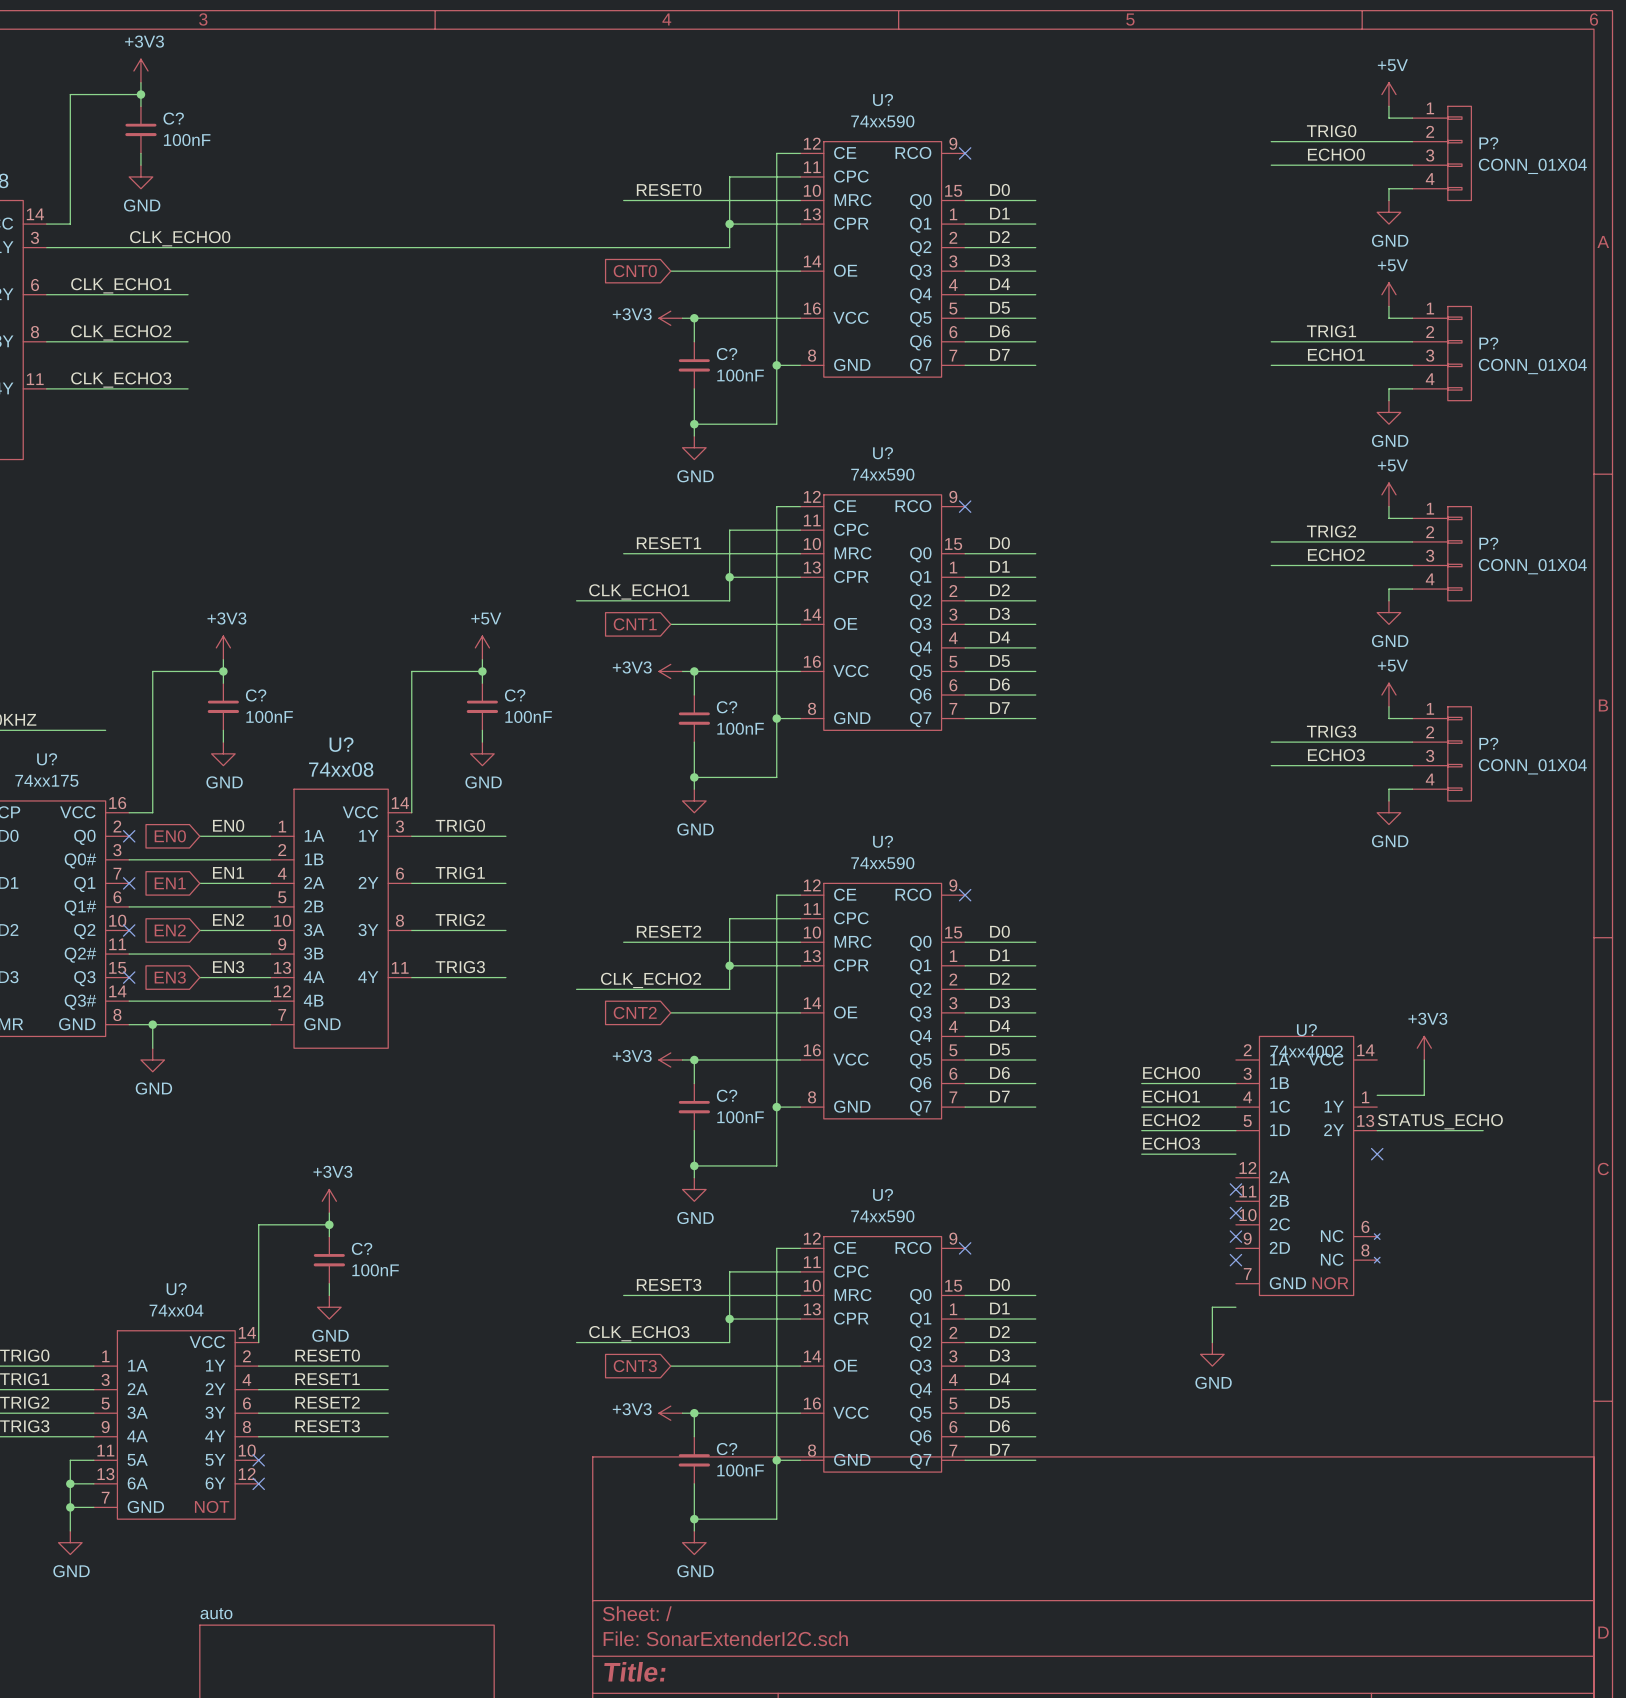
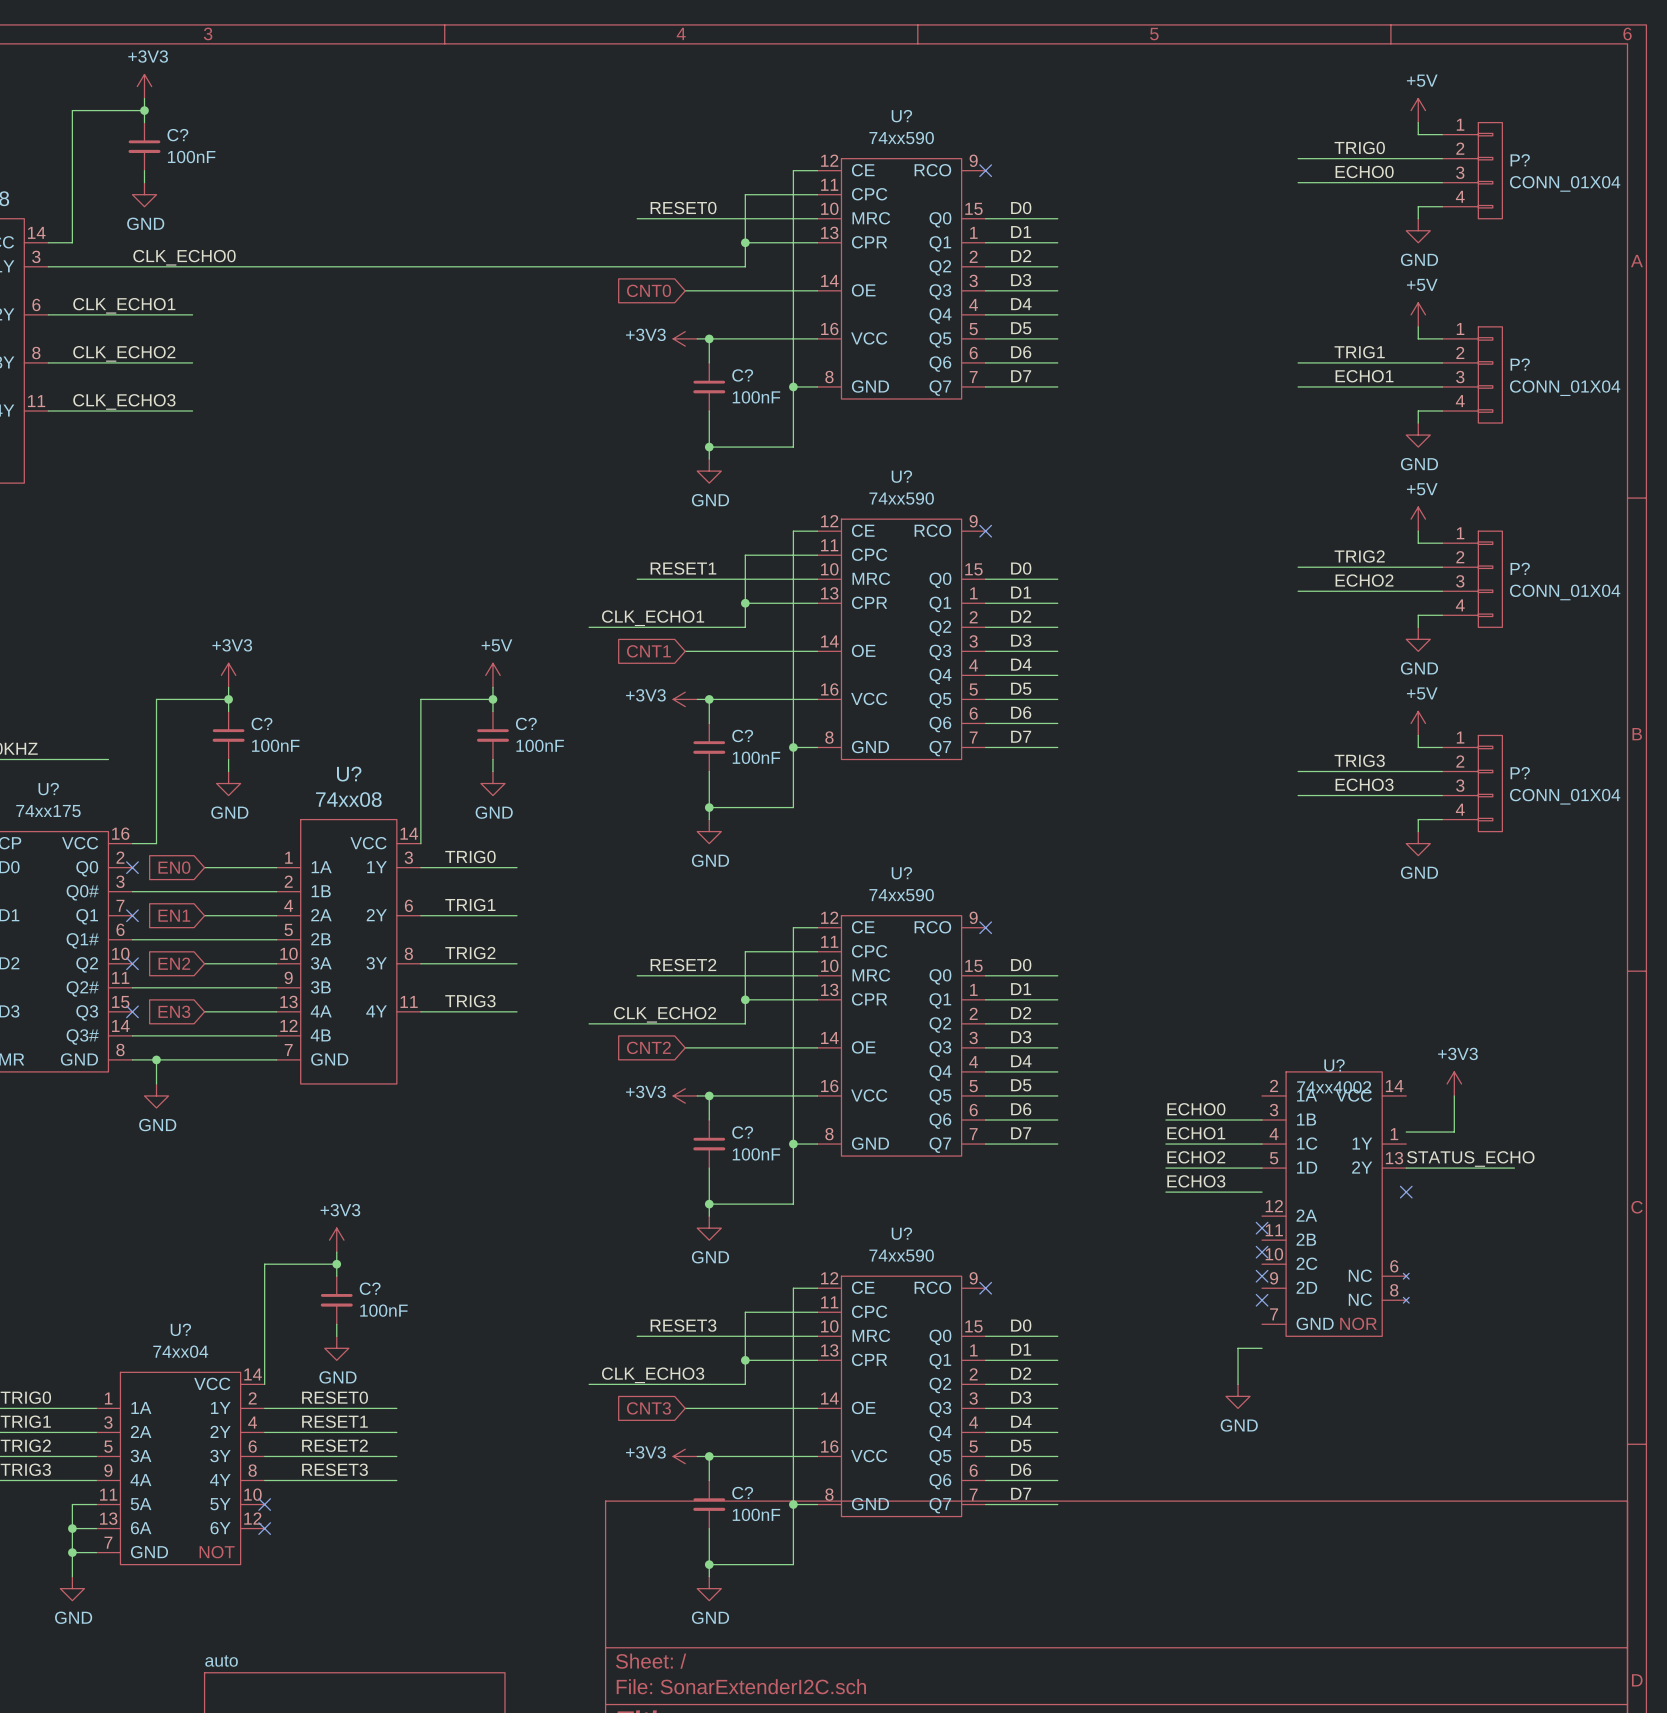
label: EN0 (228, 825) -> none
label: EN1 (228, 872) -> none
label: EN2 (228, 919) -> none
label: EN3 (228, 967) -> none

